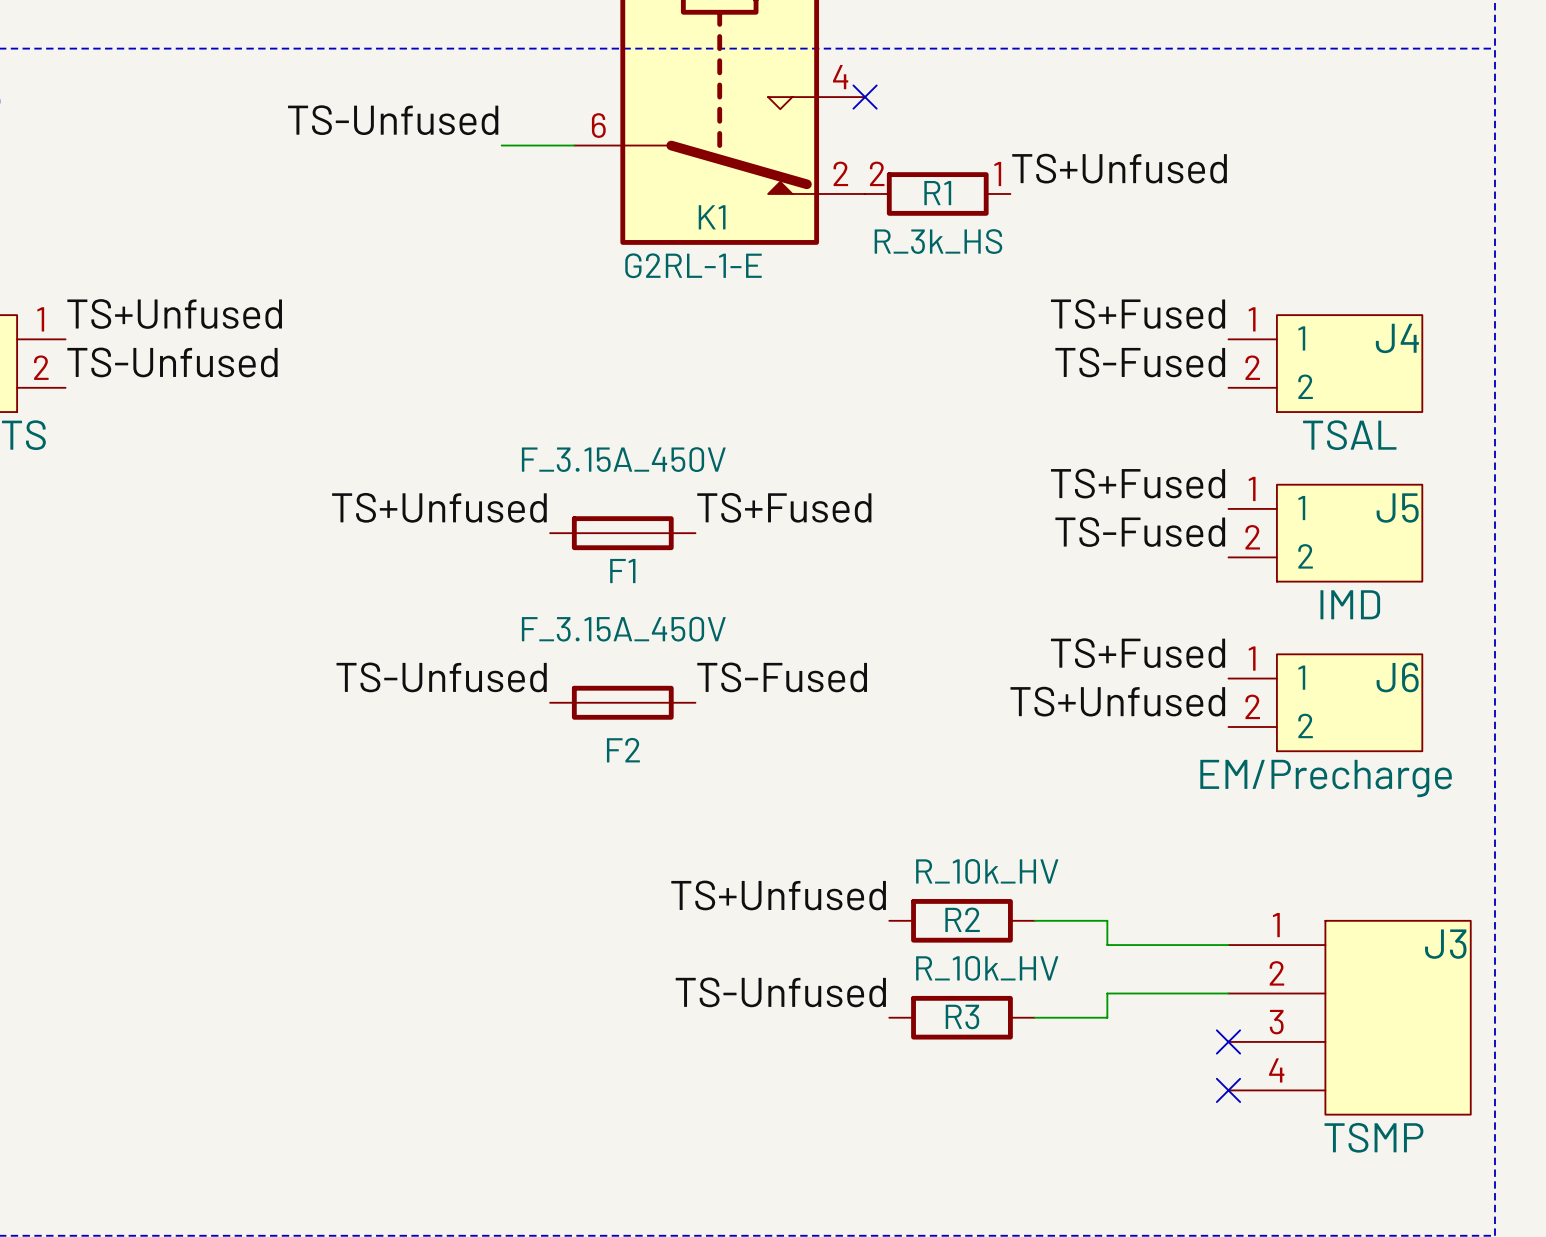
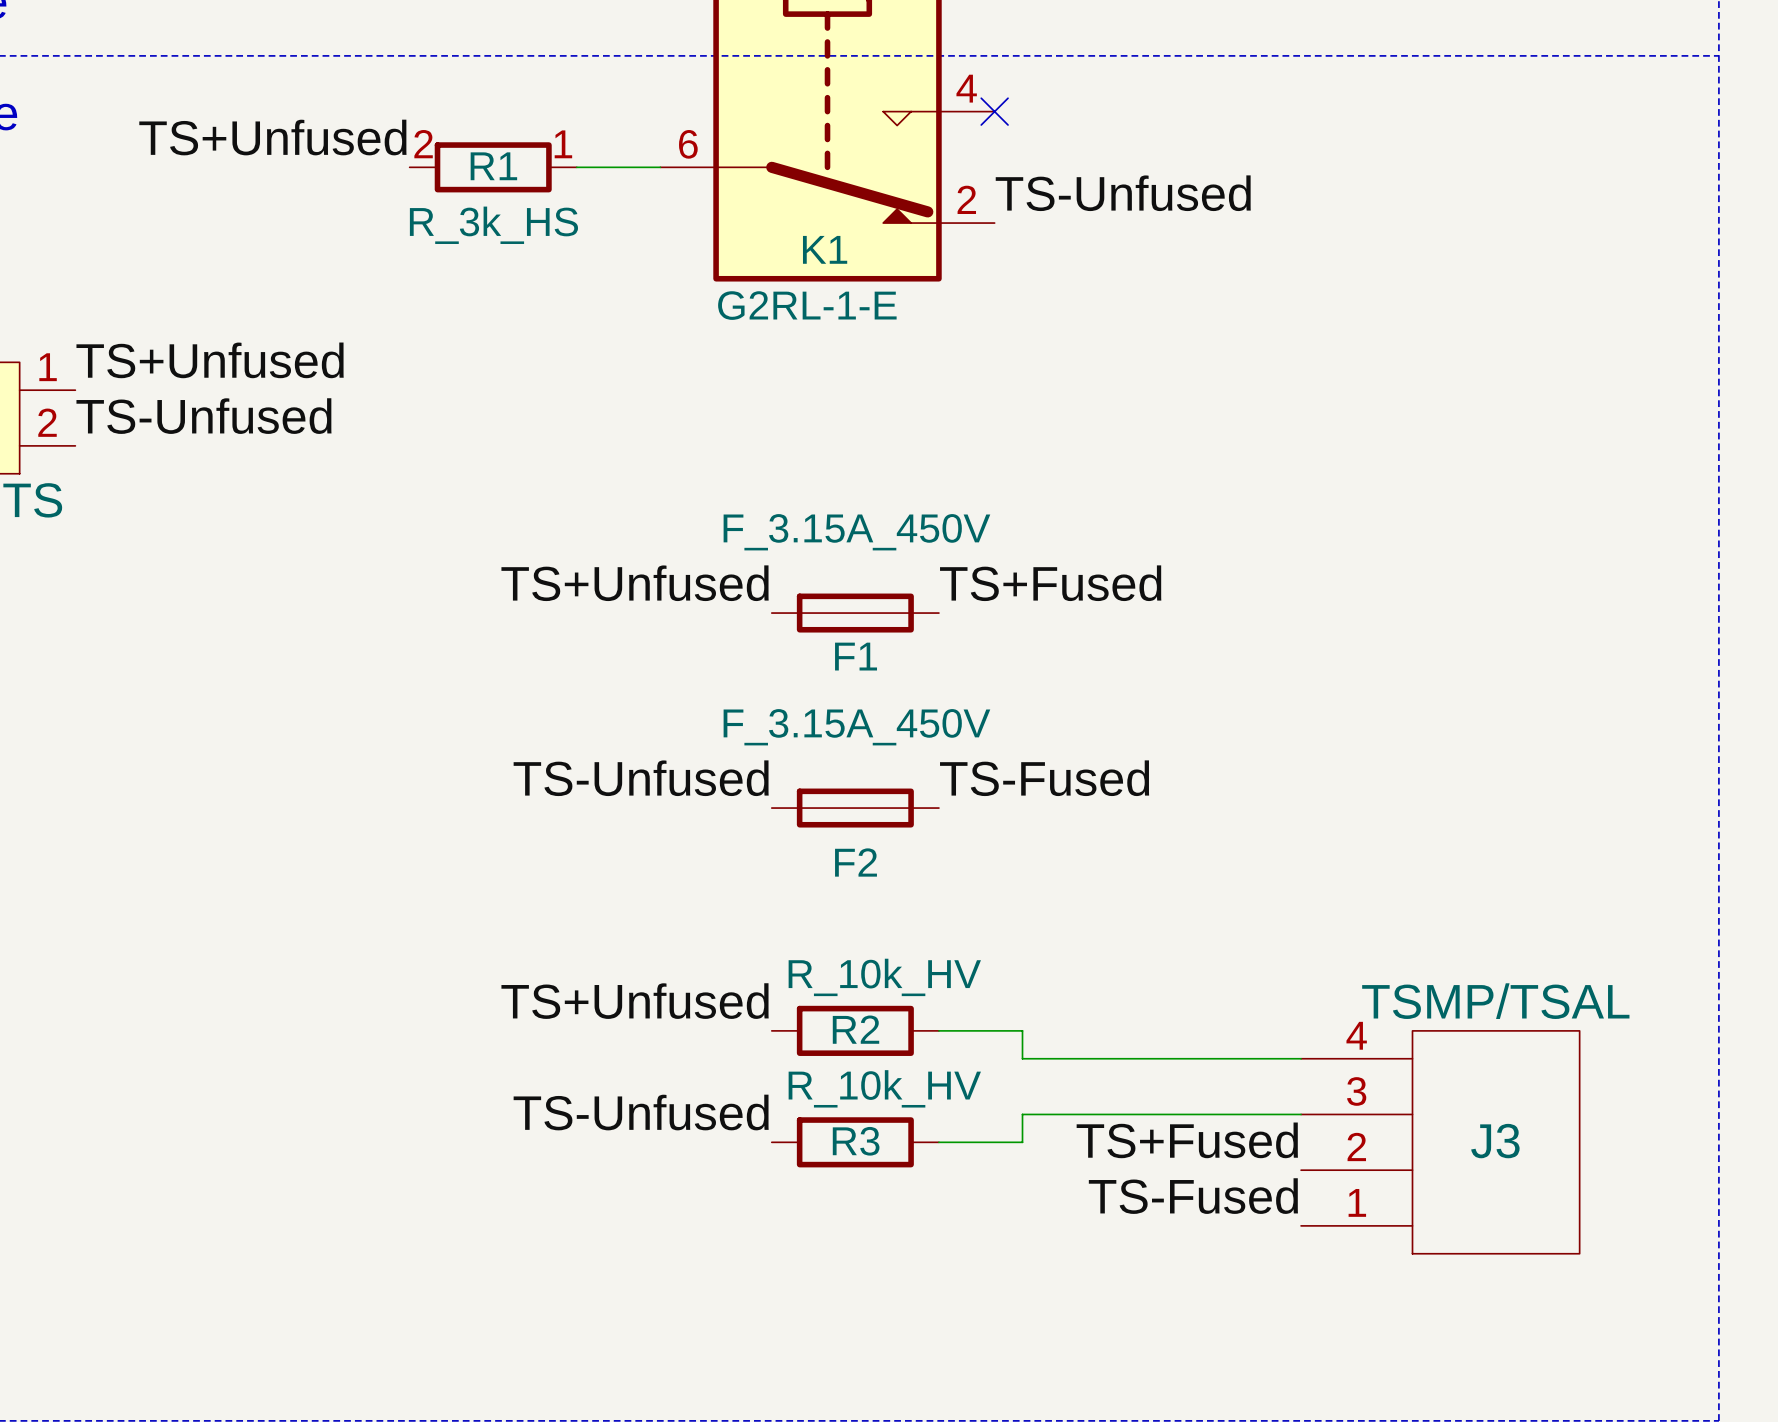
label: TS-Unfused (393, 120) -> TS+Unfused (272, 137)
label: TS+Unfused (1119, 168) -> TS-Unfused (1123, 193)
R1 position: (937, 193) -> (493, 167)
label: TS+Fused (1138, 314) -> none
label: TS-Fused (1140, 362) -> none
J4: TSAL (1325, 363) -> none
label: TS+Fused (1138, 483) -> none
label position: TS+Unfused (439, 507) -> TS+Unfused (635, 583)
label position: TS+Fused (784, 507) -> TS+Fused (1050, 583)
label: TS-Fused (1140, 532) -> none
F1 position: (622, 533) -> (855, 613)
J5: IMD (1325, 533) -> none
label: TS+Fused (1138, 653) -> none
label position: TS-Unfused (441, 677) -> TS-Unfused (641, 778)
label position: TS-Fused (782, 677) -> TS-Fused (1044, 778)
label: TS+Unfused (1117, 701) -> none
F2 position: (622, 702) -> (855, 808)
J6: EM/Precharge (1325, 702) -> none
label position: TS+Unfused (778, 895) -> TS+Unfused (635, 1001)
wire: none -> (938, 1030) (1022, 1030) (1022, 1058) (1189, 1058)
R2 position: (961, 920) -> (855, 1030)
wire: (1107, 920) (1107, 945) (1228, 945) -> (1273, 1058) (1301, 1058)
J3 symbol: [1228, 920, 1471, 1115] -> [1301, 1030, 1580, 1254]
J3 name position: J3 (1445, 944) -> J3 (1495, 1141)
wire: none -> (1301, 1114) (1022, 1114) (1022, 1142) (938, 1142)
label position: TS-Unfused (780, 992) -> TS-Unfused (641, 1112)
label: none -> TS+Fused (1187, 1140)
wire: (1228, 993) (1107, 993) (1107, 1017) (1034, 1017) -> none
R3 position: (961, 1017) -> (855, 1142)
label: none -> TS-Fused (1193, 1196)
no-connect mark: (1228, 1041) -> none
no-connect mark: (1228, 1090) -> none
J3 value: TSMP (1373, 1137) -> TSMP/TSAL (1495, 1001)

